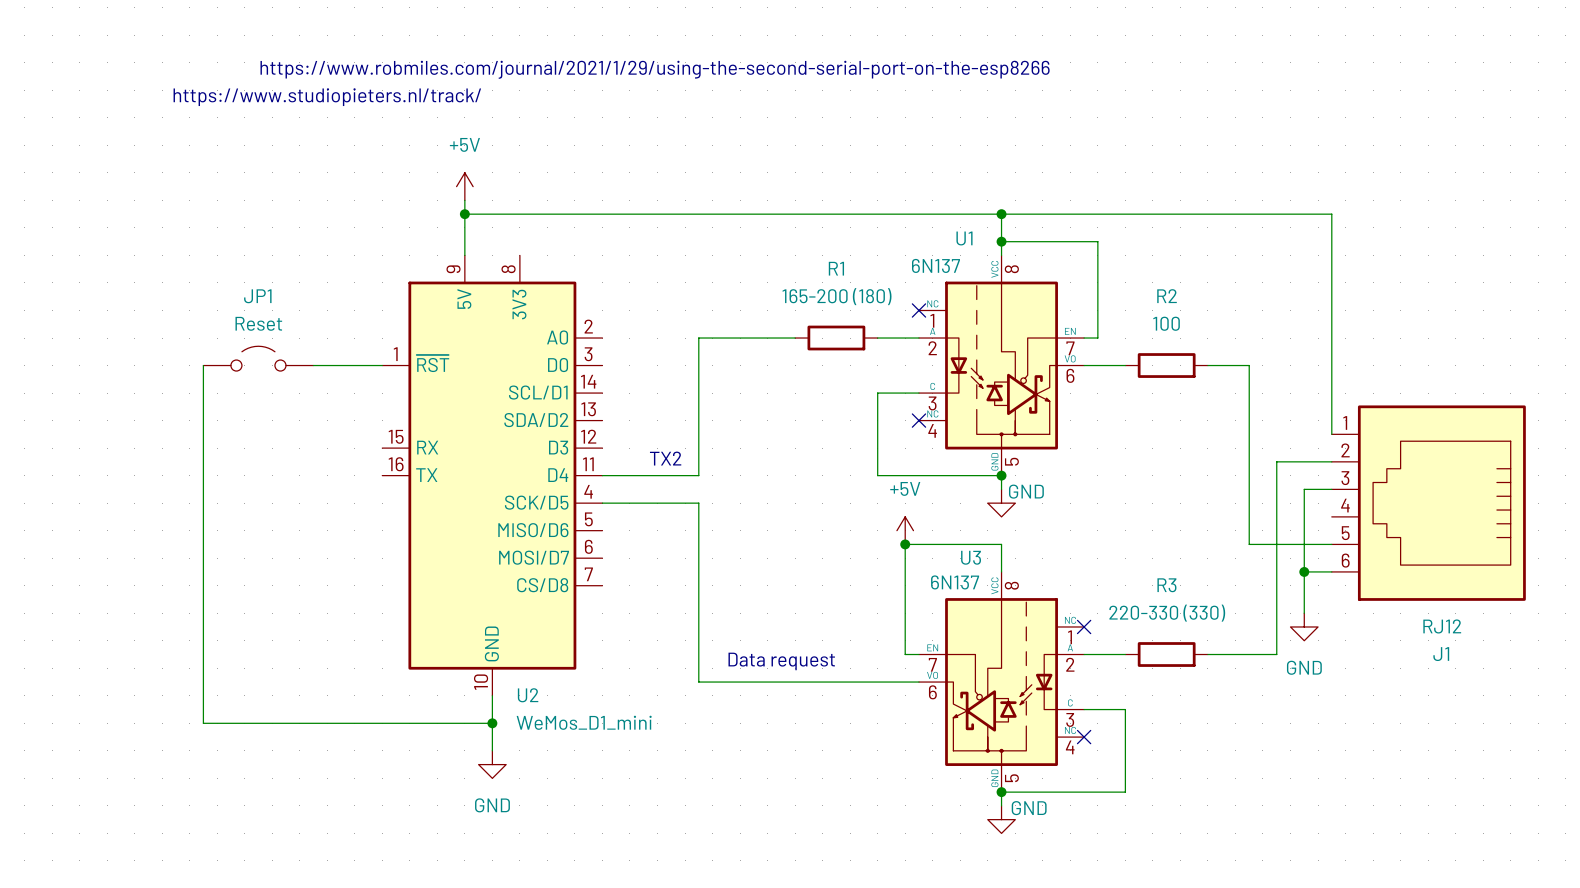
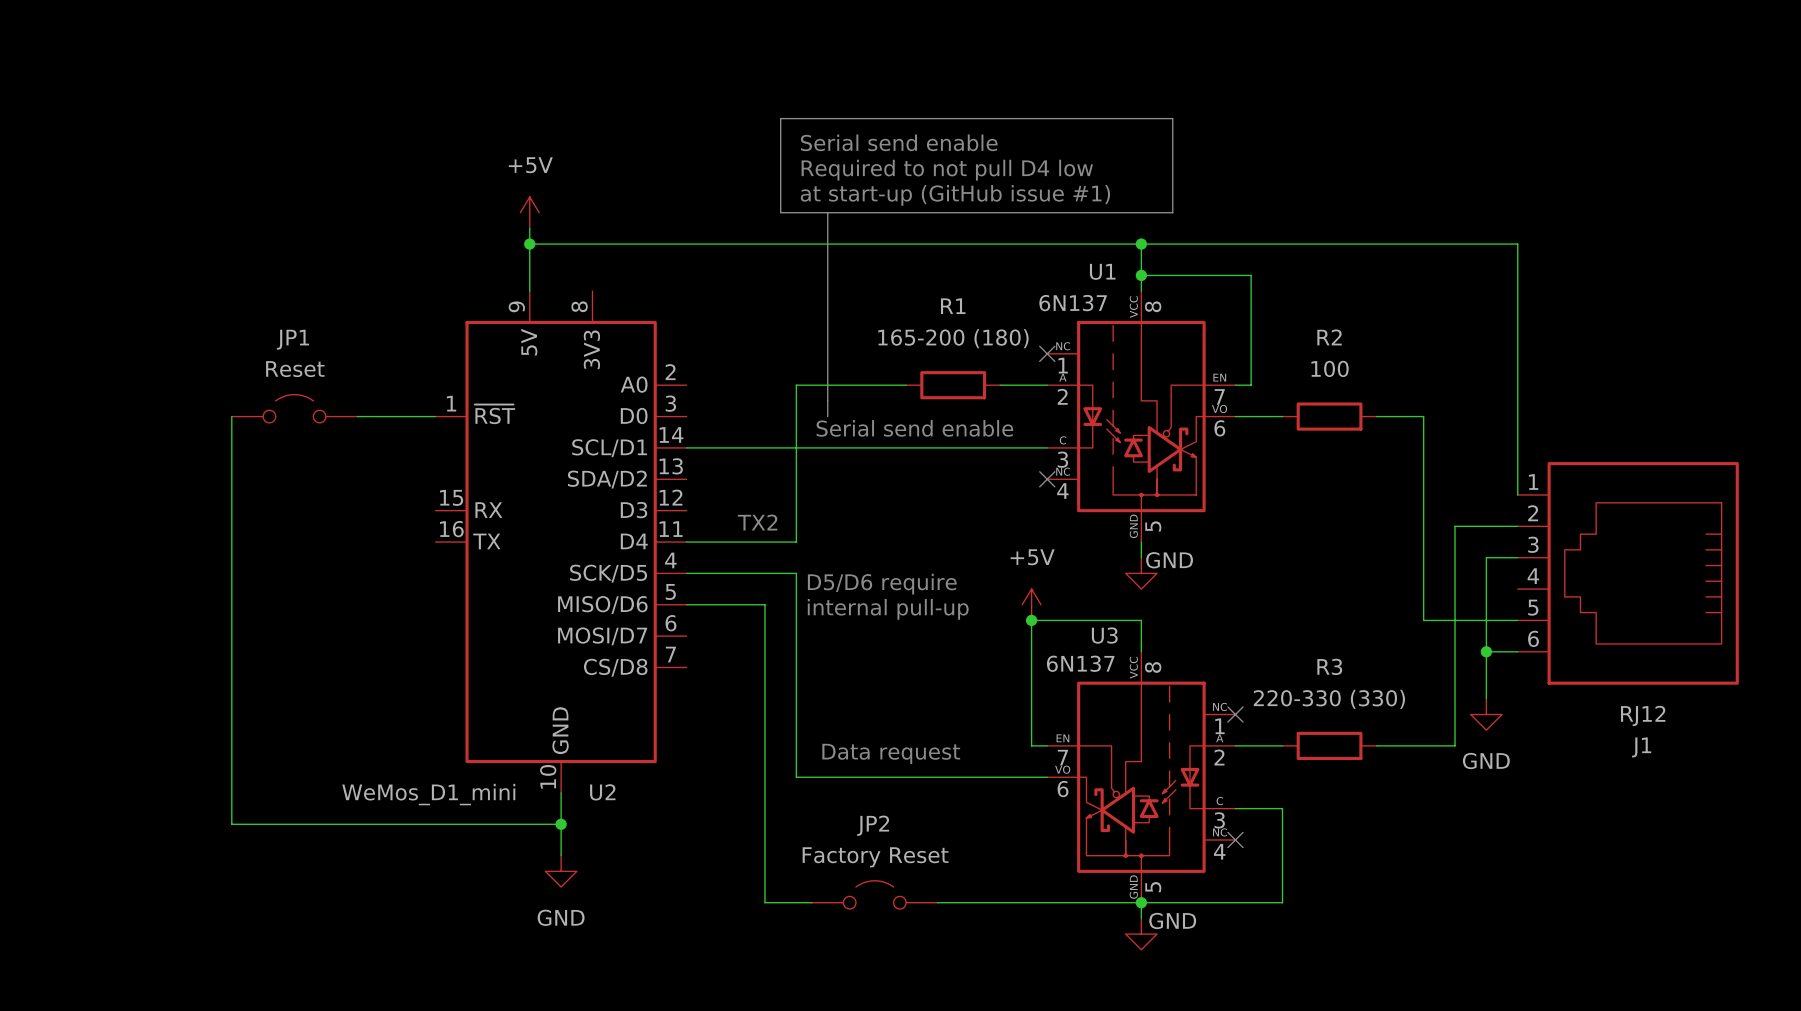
text: https://www.robmiles.com/journal/2021/1/29/using-the-second-serial-port-on-the-esp8266 (655, 69) -> none
text: https://www.studiopieters.nl/track/ (327, 97) -> none
line: none -> (780, 118) (1172, 118) (1172, 212) (780, 212) (780, 118)
text: none -> Serial send enable (899, 142)
text: none -> Required to not pull D4 low (947, 170)
text: none -> at start-up (GitHub issue #1) (955, 195)
line: none -> (827, 212) (827, 416)
text: none -> Serial send enable (914, 428)
wire: (877, 393) (877, 475) (1001, 475) -> (1000, 447) (686, 447)
junction: (1001, 475) -> none
text: none -> D5/D6 require (882, 584)
wire: none -> (686, 604) (764, 604) (764, 902) (812, 902)
text: none -> internal pull-up (888, 609)
U2 value position: WeMos_D1_mini (584, 722) -> WeMos_D1_mini (428, 794)
JP2: none -> Factory Reset (874, 894)
wire: none -> (937, 902) (1141, 902)

